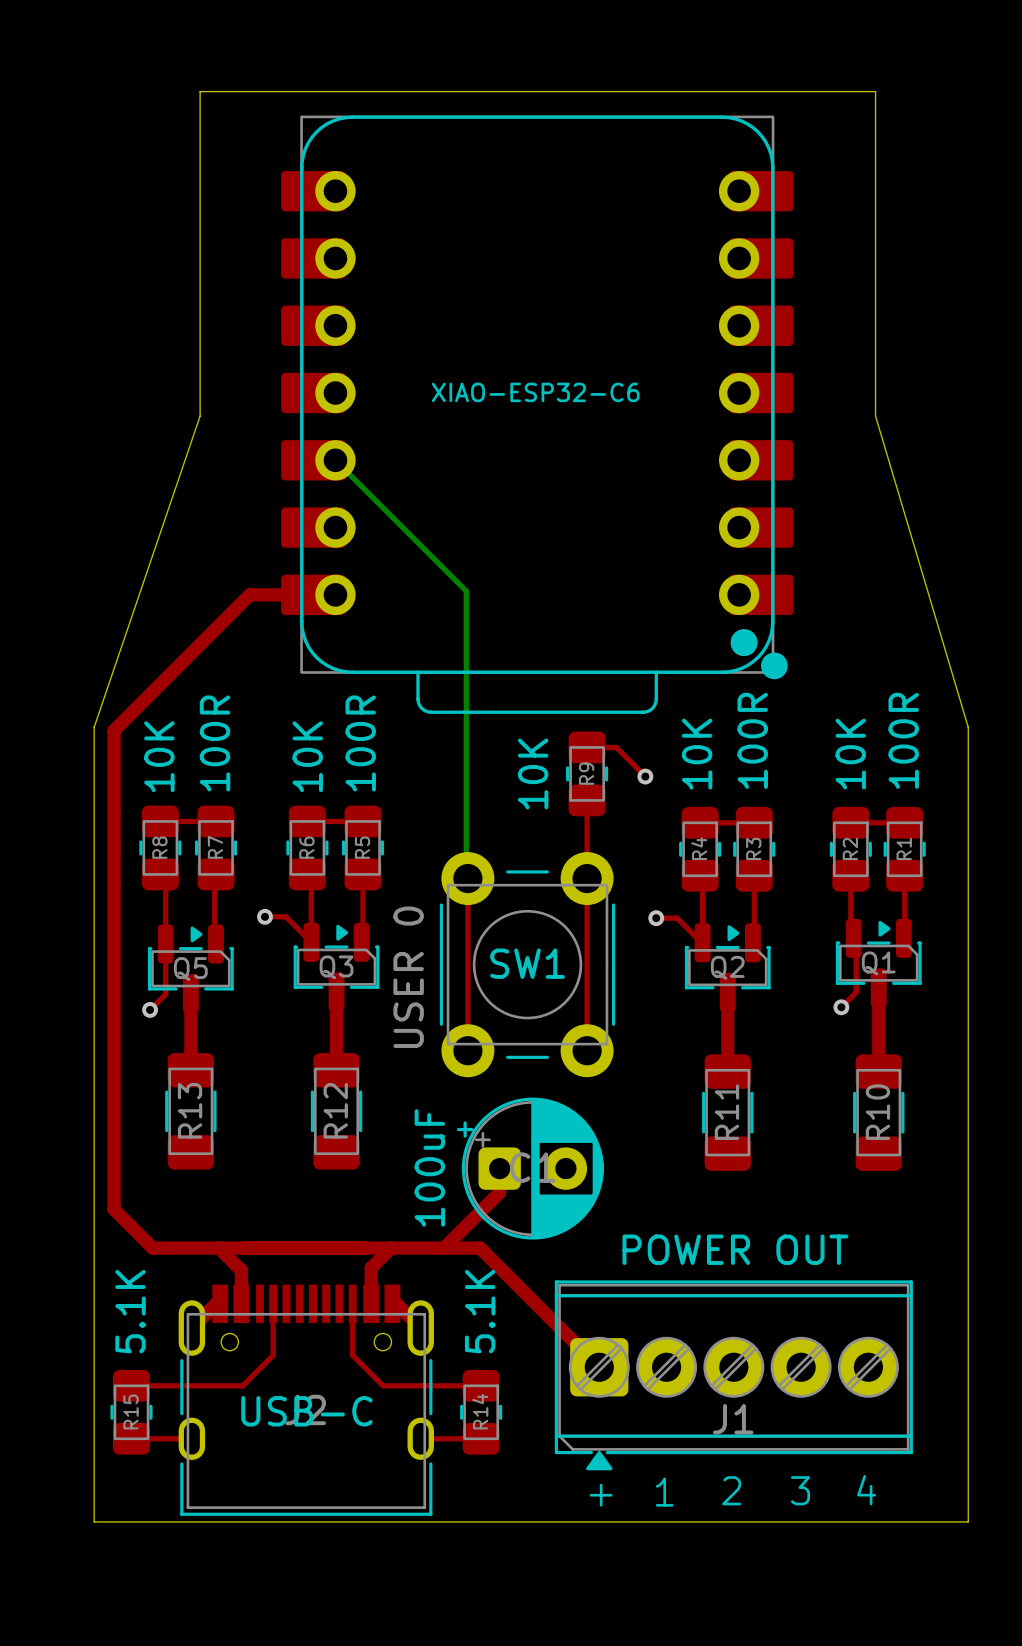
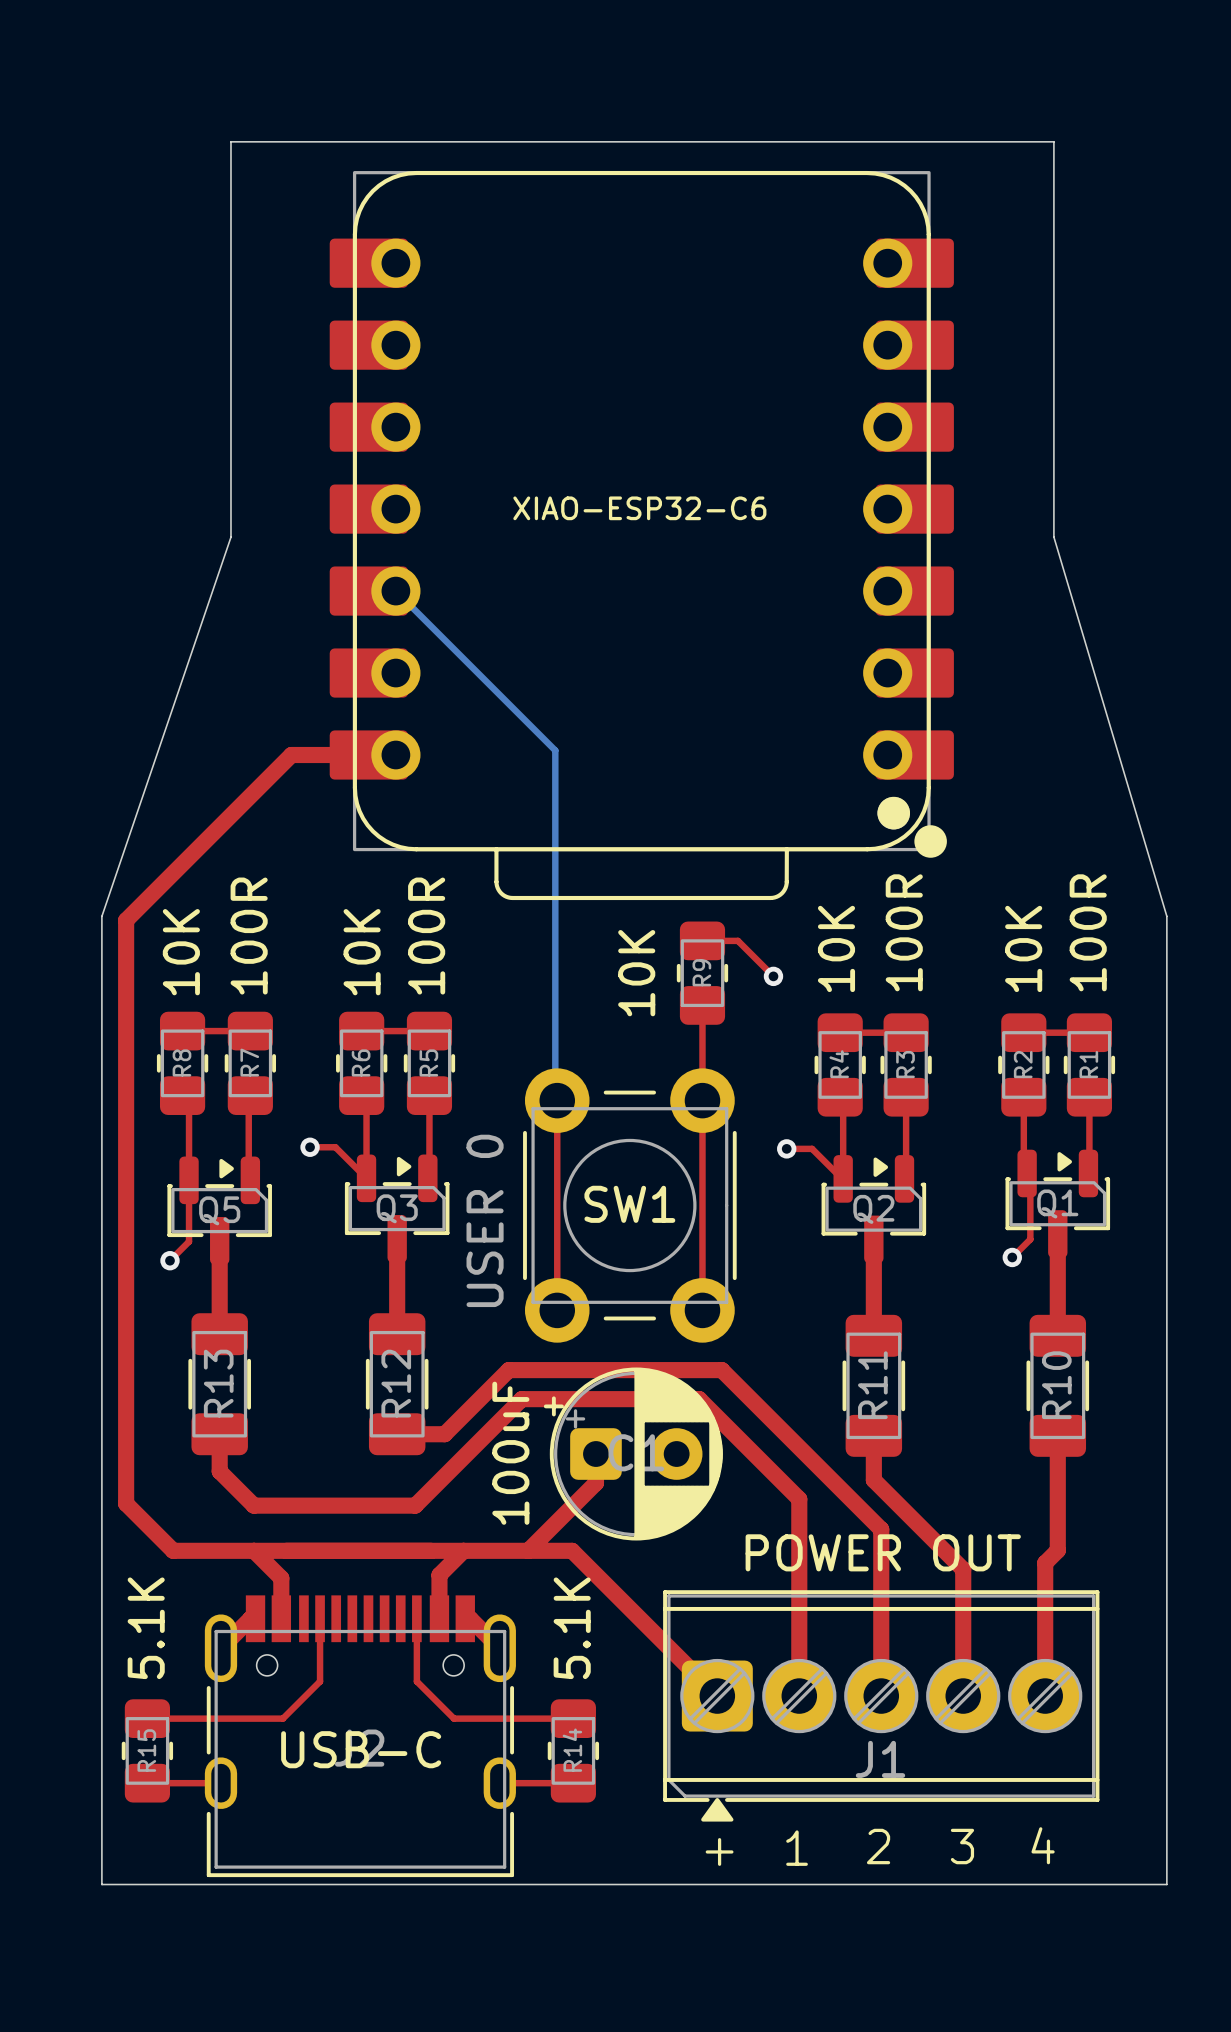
top track: none -> (219, 1434) (219, 1471) (253, 1505) (415, 1505) (521, 1399) (699, 1399) (799, 1499) (799, 1696)
top track: none -> (397, 1434) (444, 1434) (508, 1370) (721, 1370) (881, 1529) (881, 1696)
top track: none -> (873, 1435) (873, 1480) (963, 1569) (963, 1696)
top track: none -> (1057, 1435) (1057, 1550) (1045, 1563) (1045, 1696) (1057, 1683)

